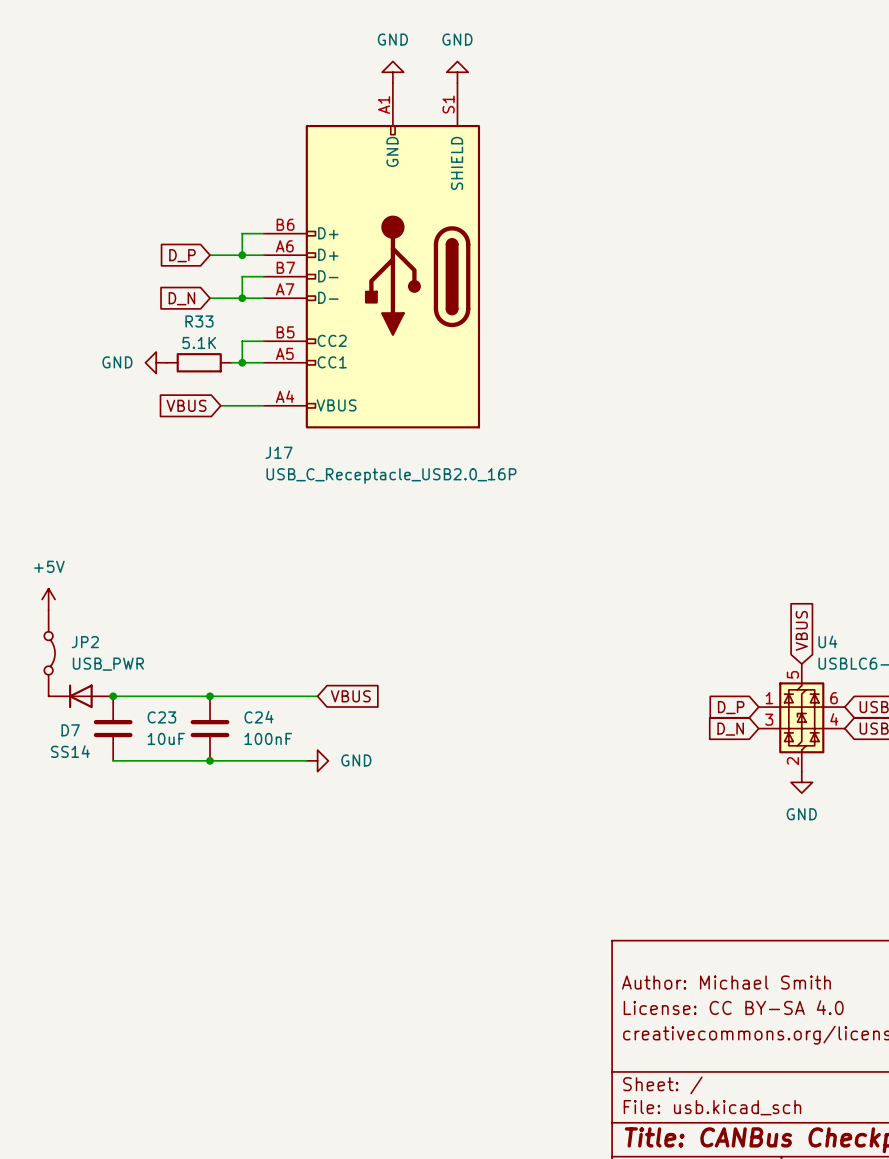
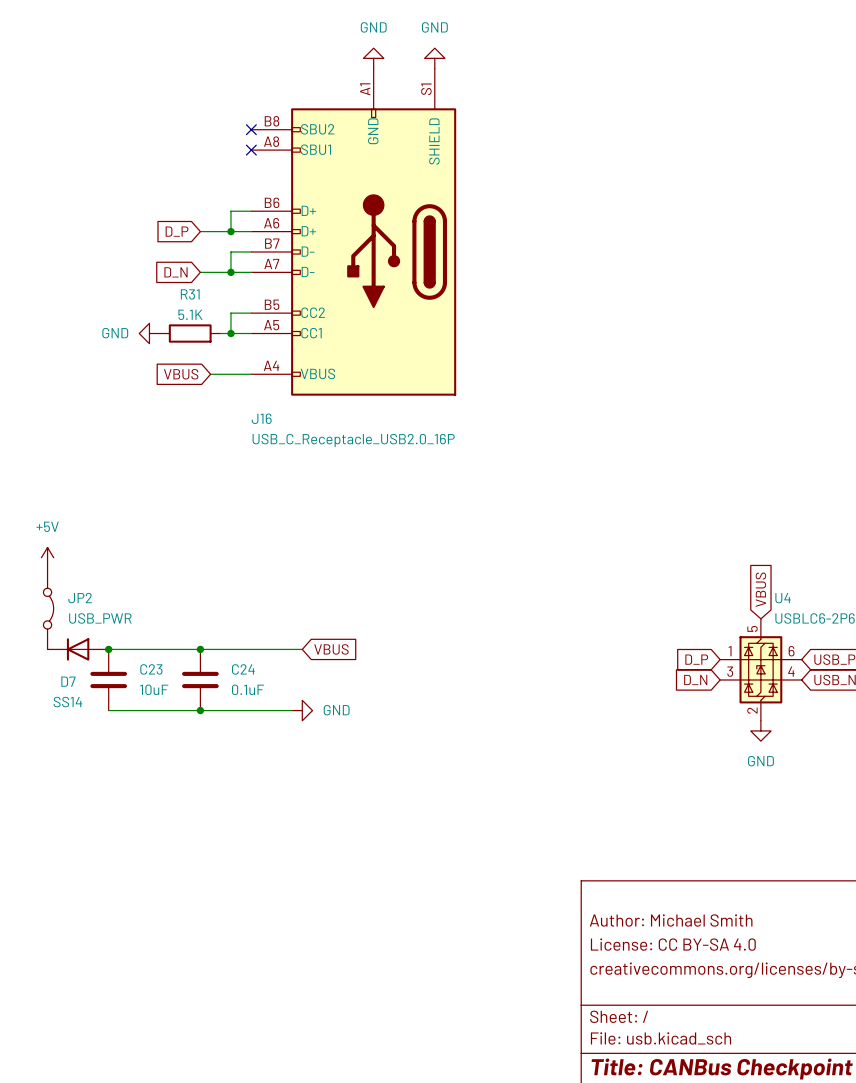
no-connect mark: none -> (251, 129)
no-connect mark: none -> (251, 150)
J17: USB_C_Receptacle_USB2.0_16P (371, 255) -> none
J16: none -> USB_C_Receptacle_USB2.0_16P (353, 232)
R33 name: R33 (199, 321) -> R31 (190, 294)
C24 value: 100nF (268, 738) -> 0.1uF (248, 689)

